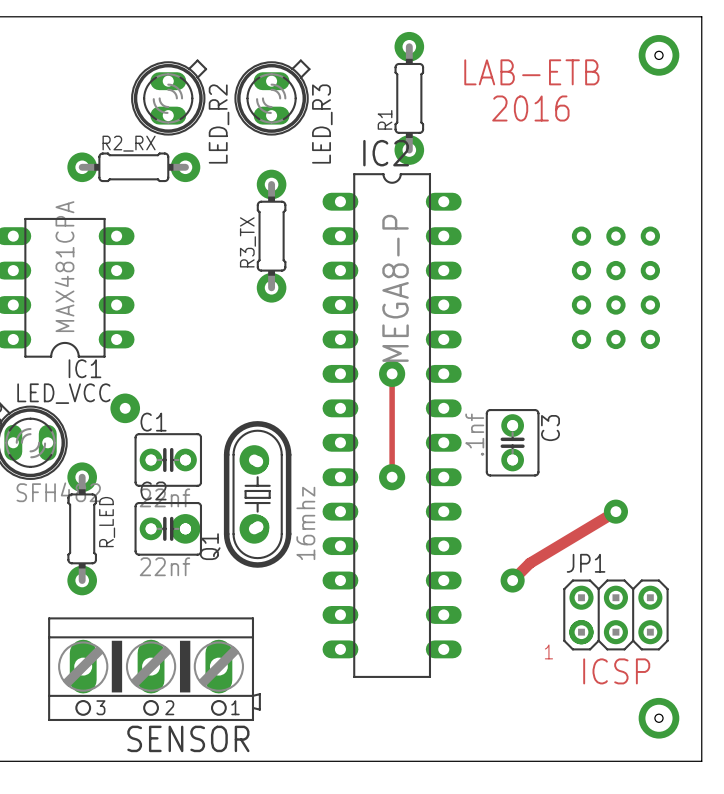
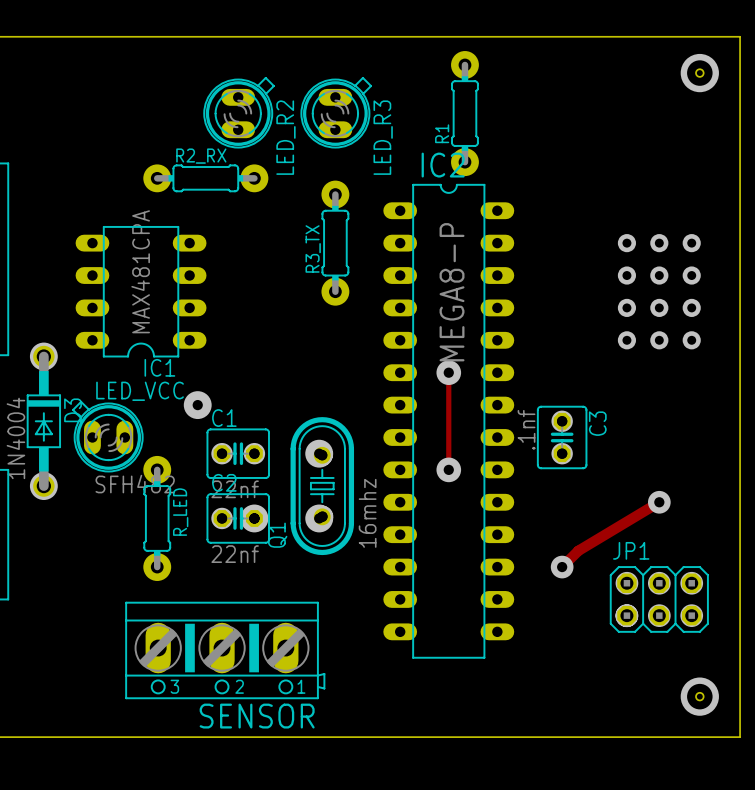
text: LAB-ETB (531, 72) -> none
text: 2016 (530, 108) -> none
text: 1 (548, 651) -> none
text: ICSP (616, 671) -> none

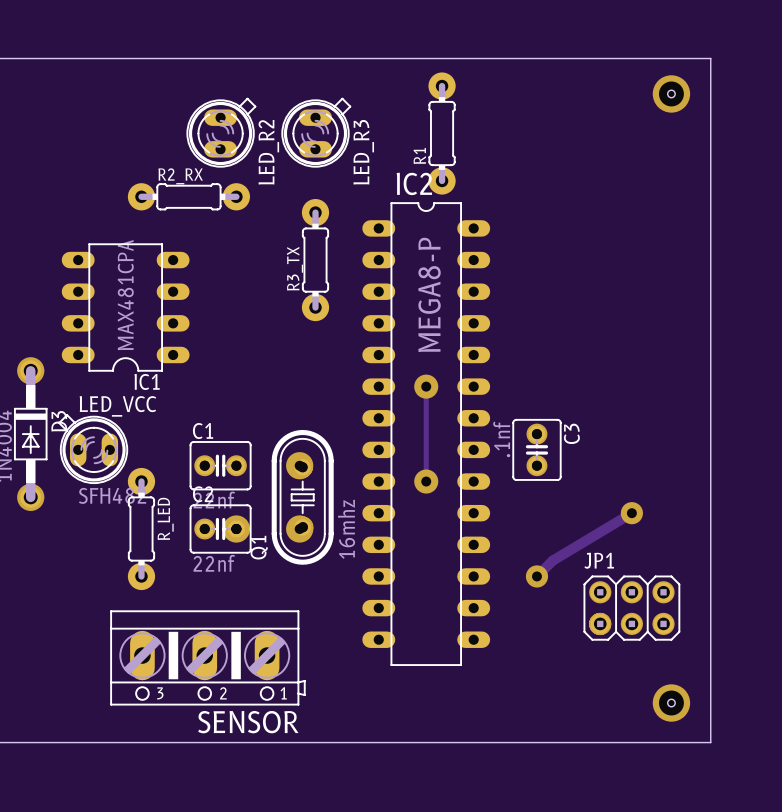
via: (626, 243) -> none
via: (659, 243) -> none
via: (691, 243) -> none
via: (626, 275) -> none
via: (659, 275) -> none
via: (691, 275) -> none
via: (626, 307) -> none
via: (659, 307) -> none
via: (691, 307) -> none
via: (626, 340) -> none
via: (659, 340) -> none
via: (691, 340) -> none
via: (197, 405) -> none

